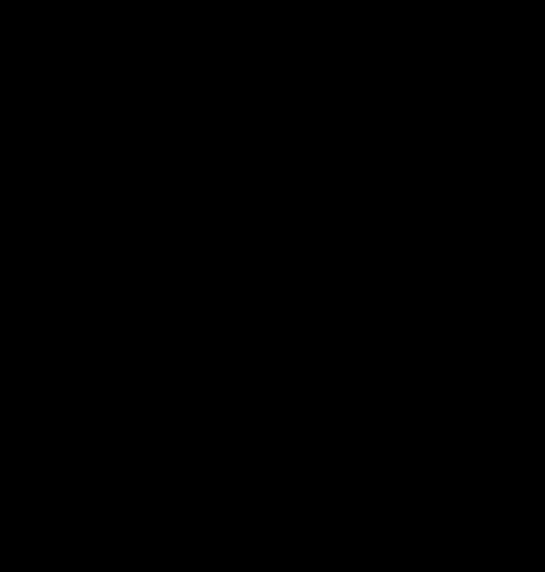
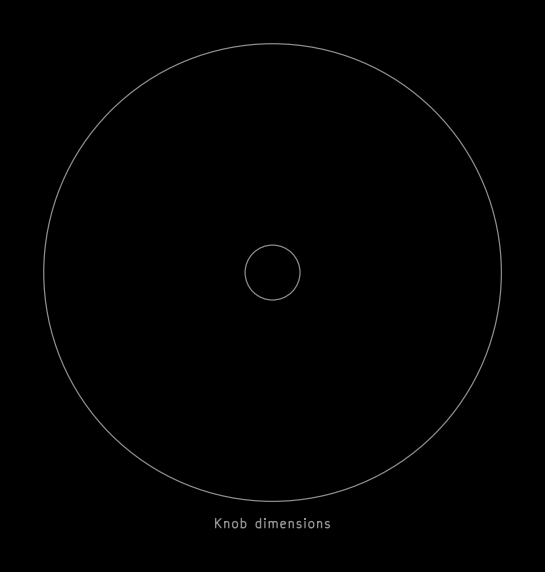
drawing: none -> [43, 43, 502, 502]
text: none -> Knob dimensions (272, 523)

